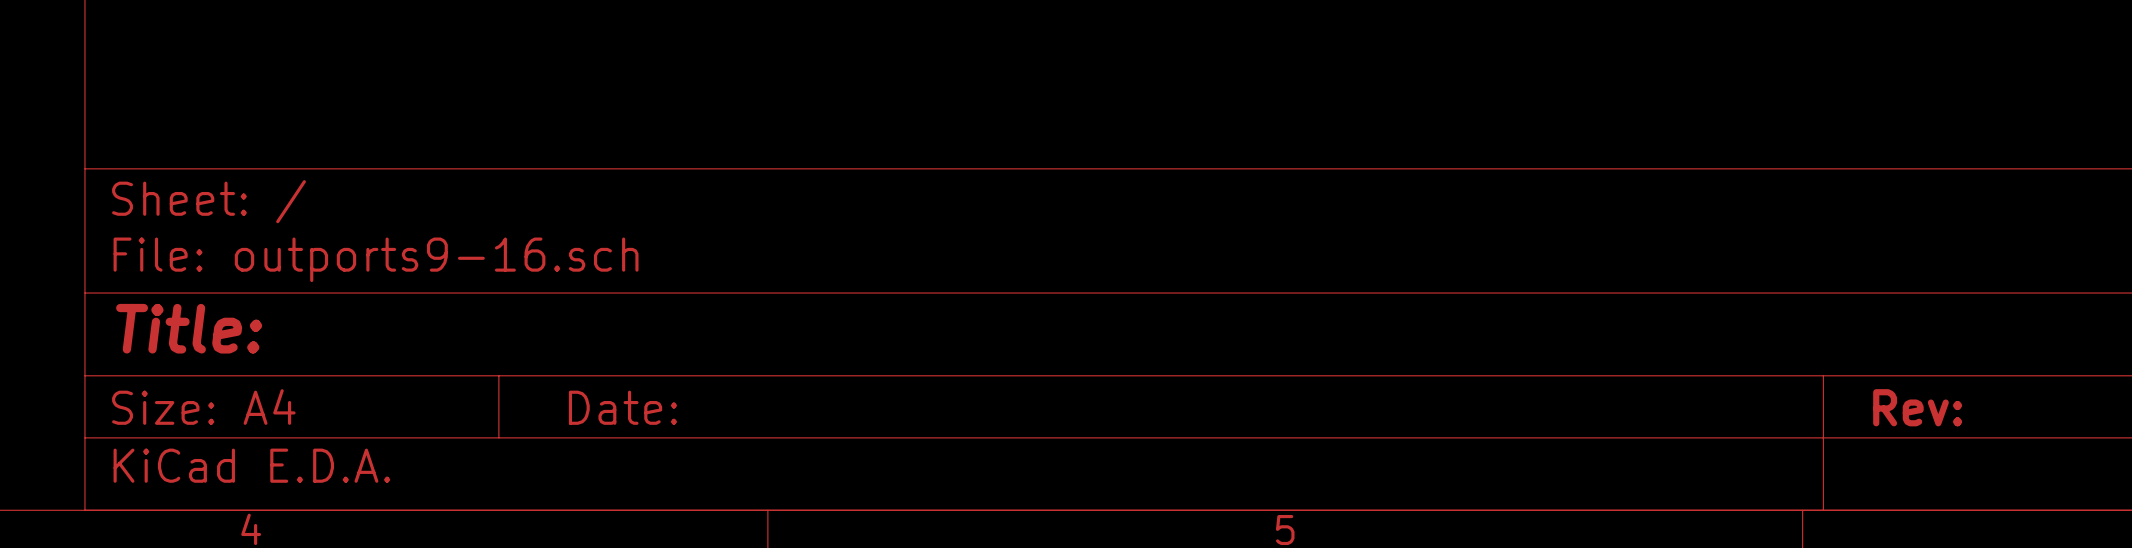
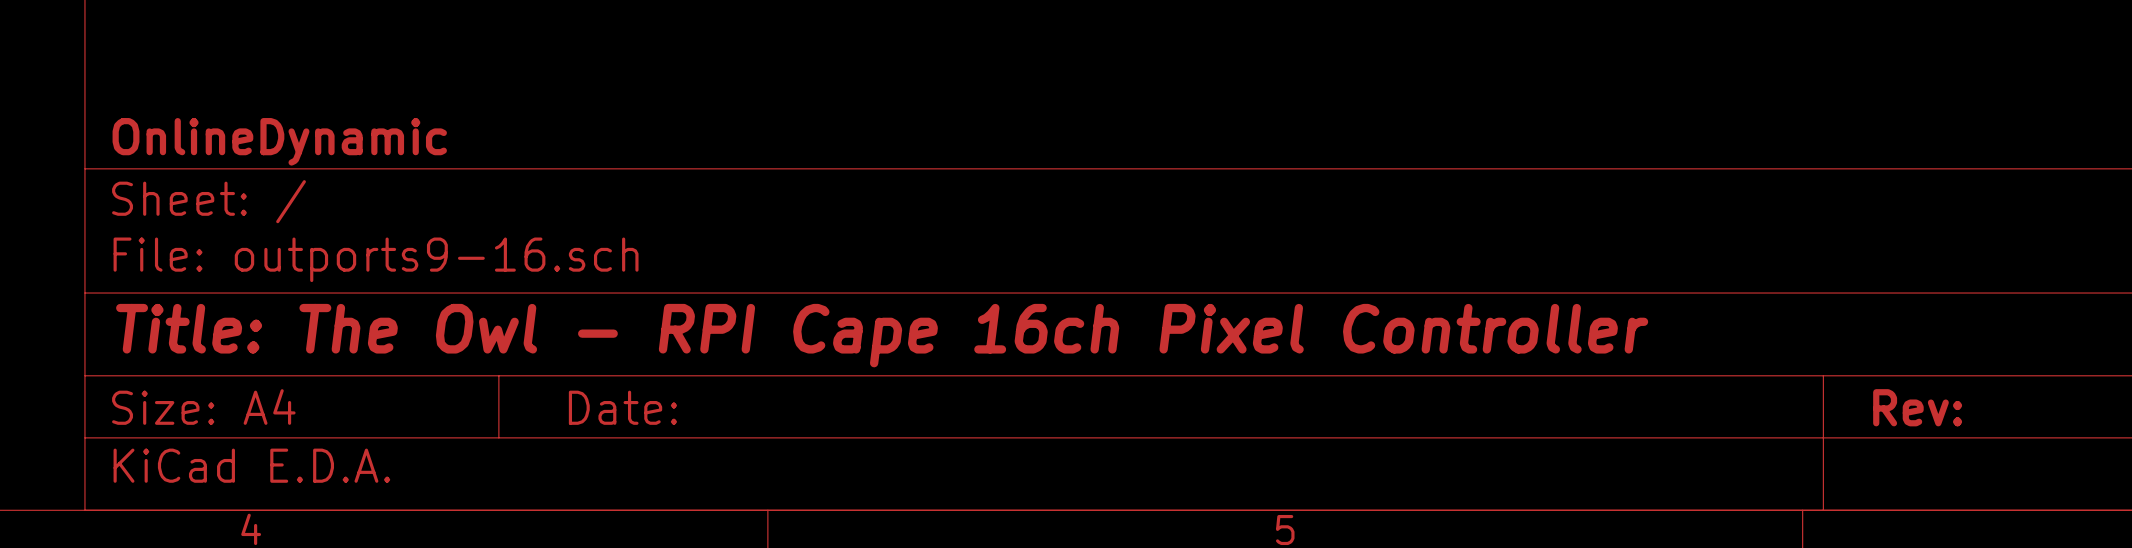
title block: none -> OnlineDynamic (279, 141)
title block: Title: (189, 328) -> Title: The Owl - RPI Cape 16ch Pixel Controller (882, 335)

